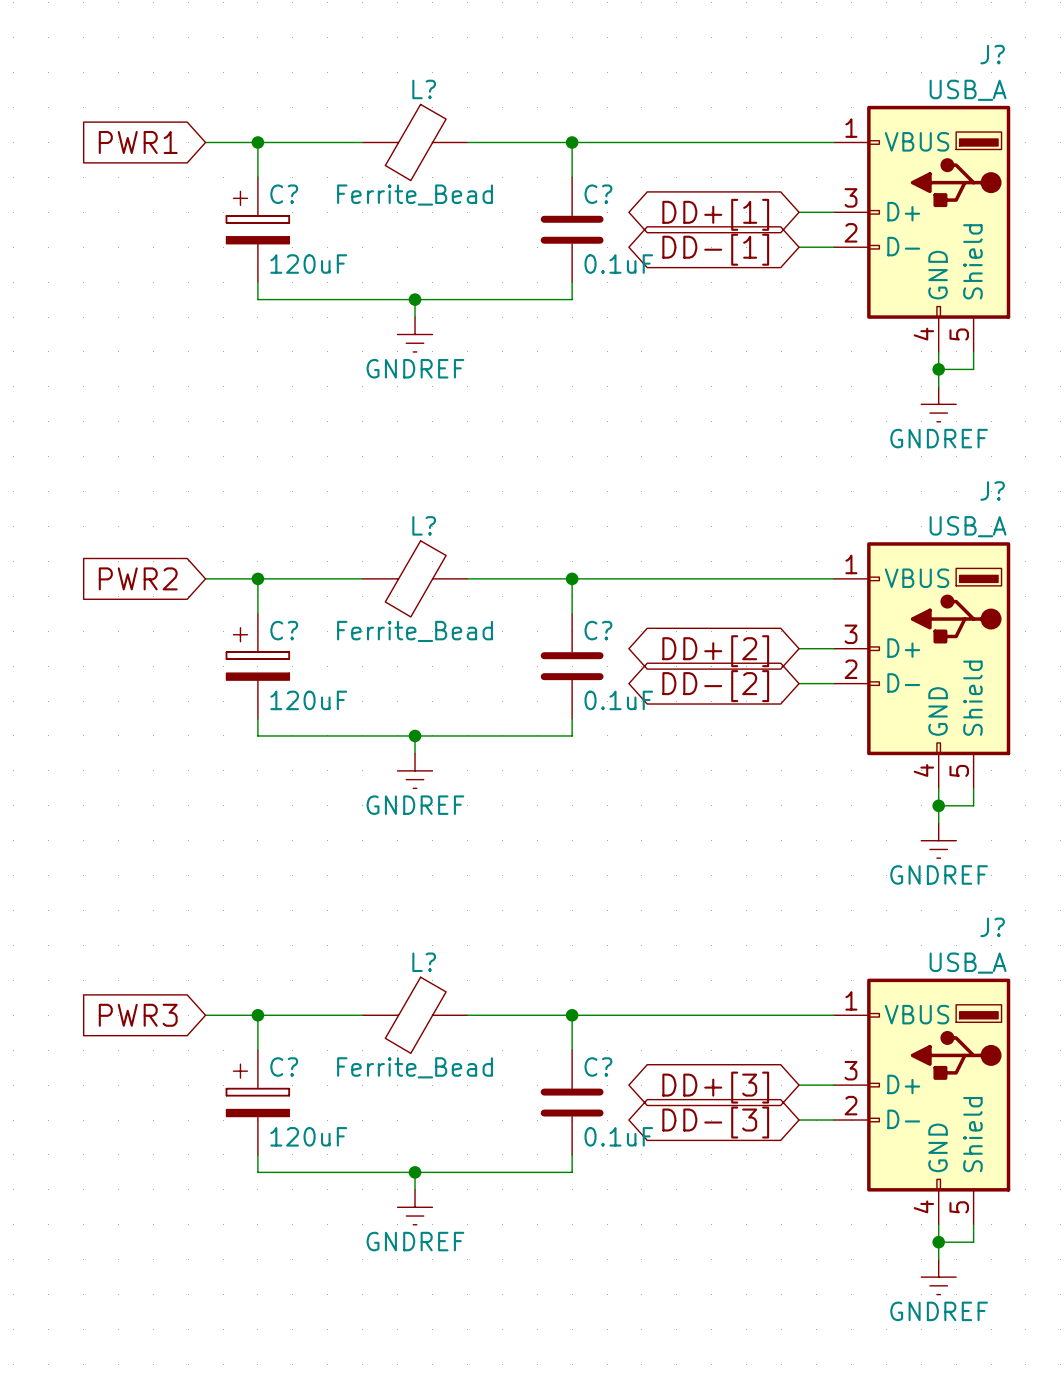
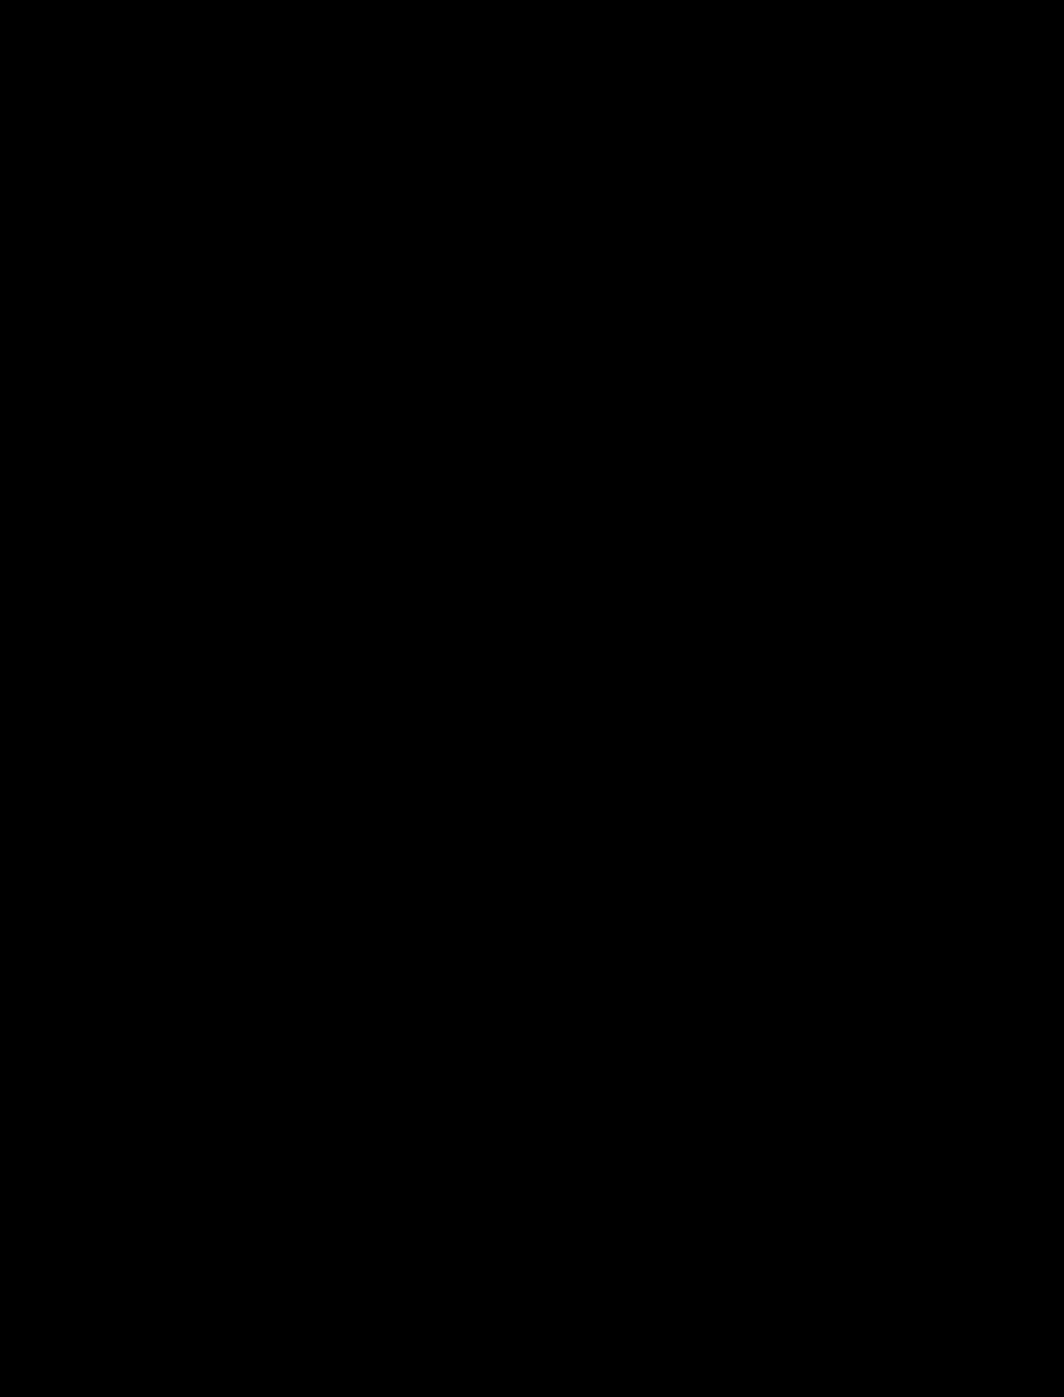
global label: PWR1 (138, 142) -> none
wire: (205, 142) (362, 142) -> none
wire: (257, 142) (257, 177) -> none
junction: (257, 142) -> none
L?: Ferrite_Bead (415, 142) -> none
wire: (467, 142) (833, 142) -> none
wire: (572, 142) (572, 177) -> none
junction: (572, 142) -> none
wire: (799, 212) (833, 212) -> none
global label: DD+[1] (715, 214) -> none
J?: USB_A (922, 228) -> none
C?: 120uF (257, 229) -> none
C?: 0.1uF (572, 229) -> none
wire: (799, 247) (833, 247) -> none
global label: DD-[1] (715, 249) -> none
wire: (257, 282) (257, 299) (572, 299) (572, 282) -> none
wire: (415, 299) (415, 317) -> none
junction: (415, 299) -> none
power symbol: GNDREF (415, 334) -> none
wire: (938, 351) (938, 386) -> none
wire: (973, 351) (973, 369) (938, 369) -> none
junction: (938, 369) -> none
power symbol: GNDREF (938, 404) -> none
global label: PWR2 (138, 578) -> none
wire: (205, 578) (362, 578) -> none
wire: (257, 578) (257, 613) -> none
junction: (257, 578) -> none
L?: Ferrite_Bead (415, 578) -> none
wire: (467, 578) (833, 578) -> none
wire: (572, 578) (572, 613) -> none
junction: (572, 578) -> none
wire: (799, 648) (833, 648) -> none
global label: DD+[2] (715, 651) -> none
J?: USB_A (922, 665) -> none
C?: 120uF (257, 666) -> none
C?: 0.1uF (572, 666) -> none
wire: (799, 683) (833, 683) -> none
global label: DD-[2] (715, 686) -> none
wire: (257, 718) (257, 735) (572, 735) (572, 718) -> none
wire: (415, 735) (415, 753) -> none
junction: (415, 735) -> none
power symbol: GNDREF (415, 770) -> none
wire: (938, 788) (938, 823) -> none
wire: (973, 788) (973, 805) (938, 805) -> none
junction: (938, 805) -> none
power symbol: GNDREF (938, 840) -> none
global label: PWR3 (138, 1015) -> none
wire: (205, 1015) (362, 1015) -> none
wire: (257, 1015) (257, 1050) -> none
junction: (257, 1015) -> none
L?: Ferrite_Bead (415, 1015) -> none
wire: (467, 1015) (833, 1015) -> none
wire: (572, 1015) (572, 1050) -> none
junction: (572, 1015) -> none
wire: (799, 1085) (833, 1085) -> none
global label: DD+[3] (715, 1087) -> none
J?: USB_A (922, 1101) -> none
C?: 120uF (257, 1102) -> none
C?: 0.1uF (572, 1102) -> none
wire: (799, 1120) (833, 1120) -> none
global label: DD-[3] (715, 1122) -> none
wire: (257, 1154) (257, 1172) (572, 1172) (572, 1154) -> none
wire: (415, 1172) (415, 1189) -> none
junction: (415, 1172) -> none
power symbol: GNDREF (415, 1207) -> none
wire: (938, 1224) (938, 1259) -> none
wire: (973, 1224) (973, 1242) (938, 1242) -> none
junction: (938, 1242) -> none
power symbol: GNDREF (938, 1277) -> none

